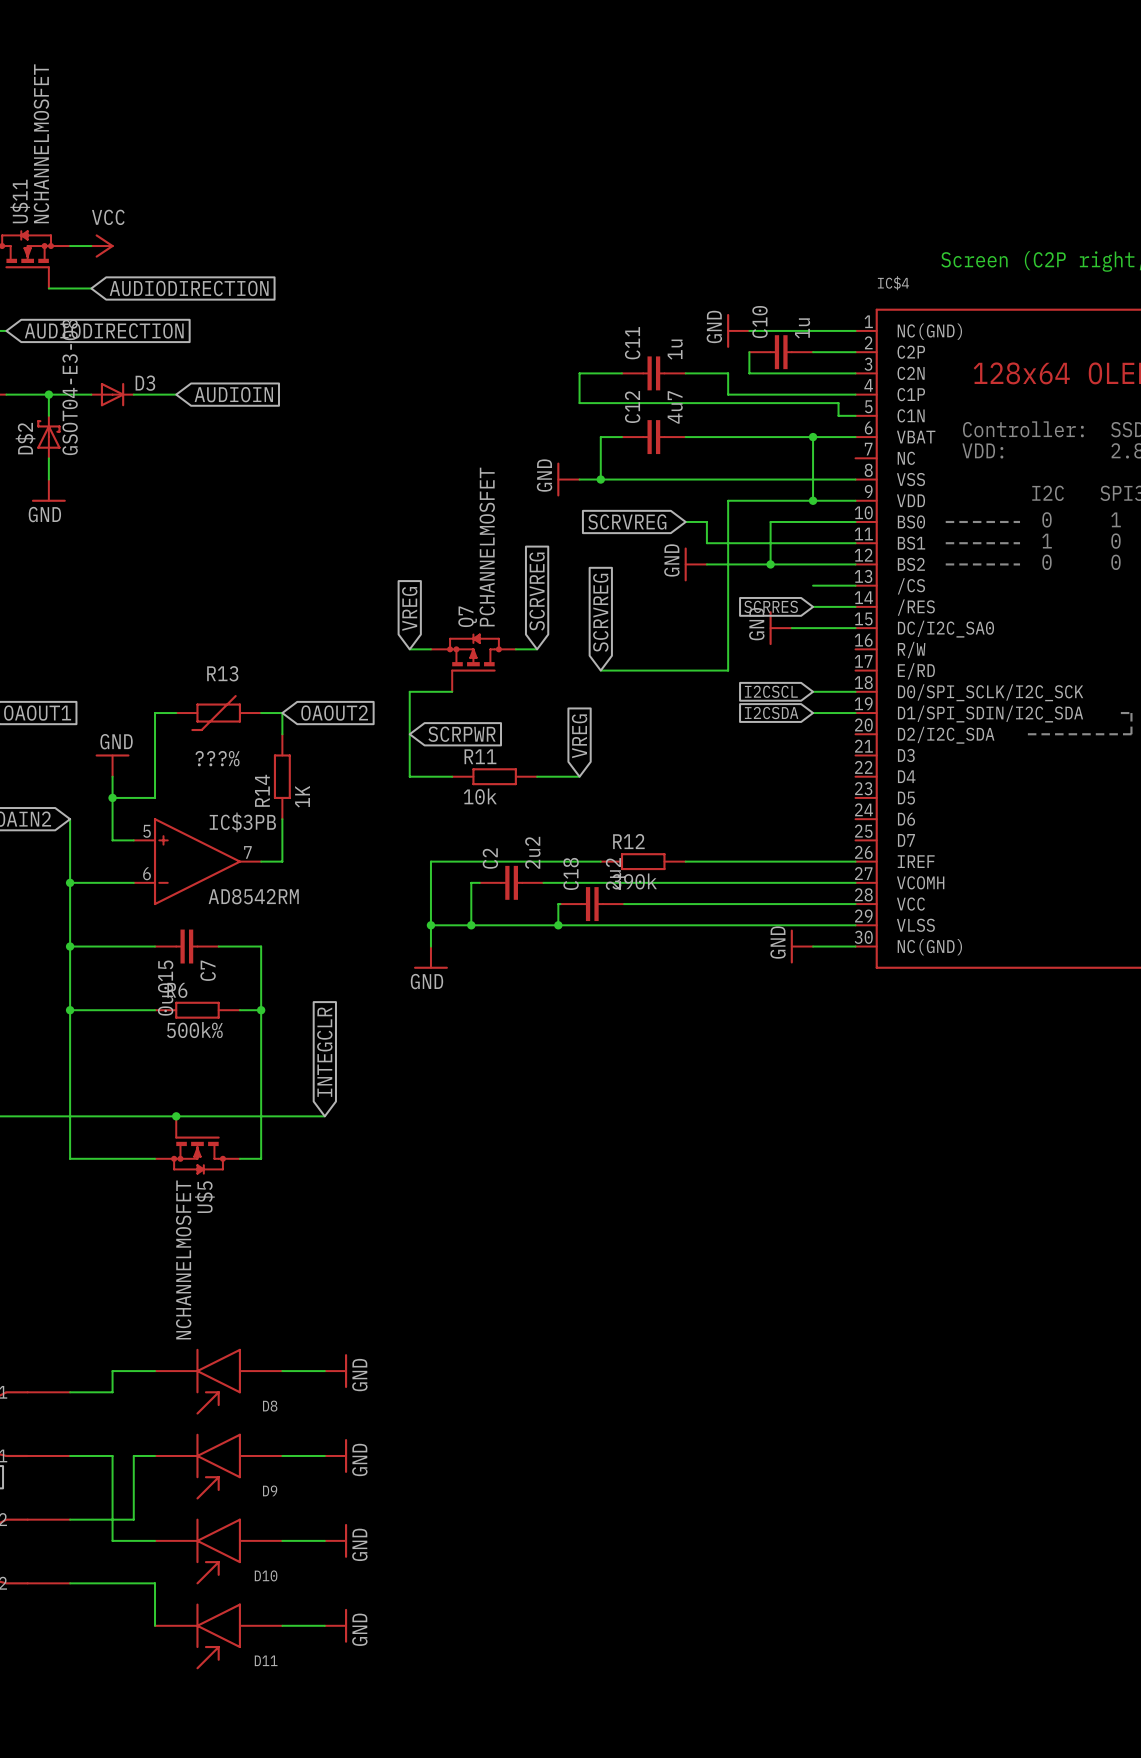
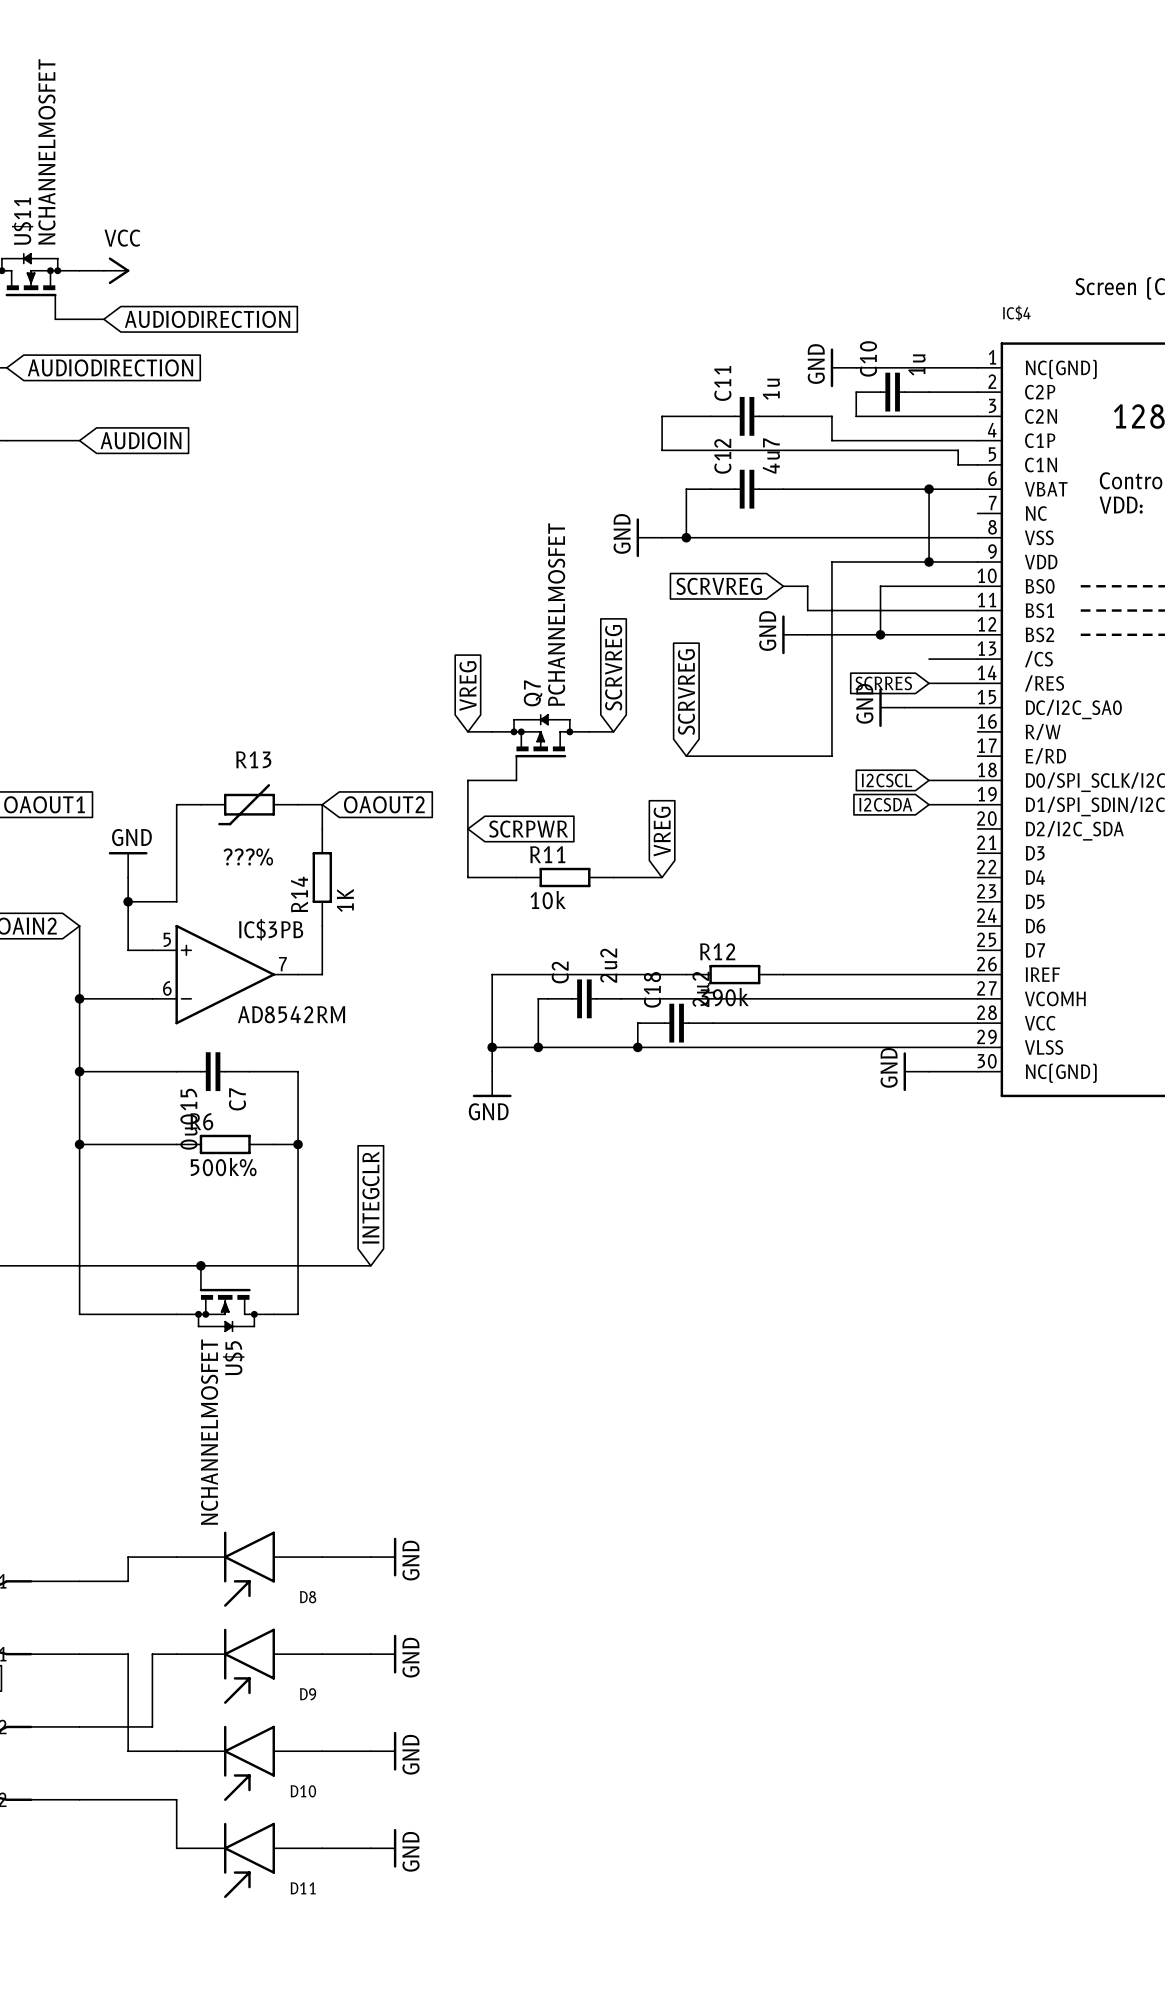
wire: (48, 394) (48, 415) -> none
junction: (48, 394) -> none
wire: (70, 394) (91, 394) -> none
D3: (112, 394) -> none
wire: (133, 394) (176, 394) -> none
global label position: AUDIOIN (233, 394) -> AUDIOIN (141, 440)
D$2: GSOT04-E3-08 (48, 437) -> none
wire: (48, 458) (48, 479) -> none
power symbol: GND (48, 490) -> none

